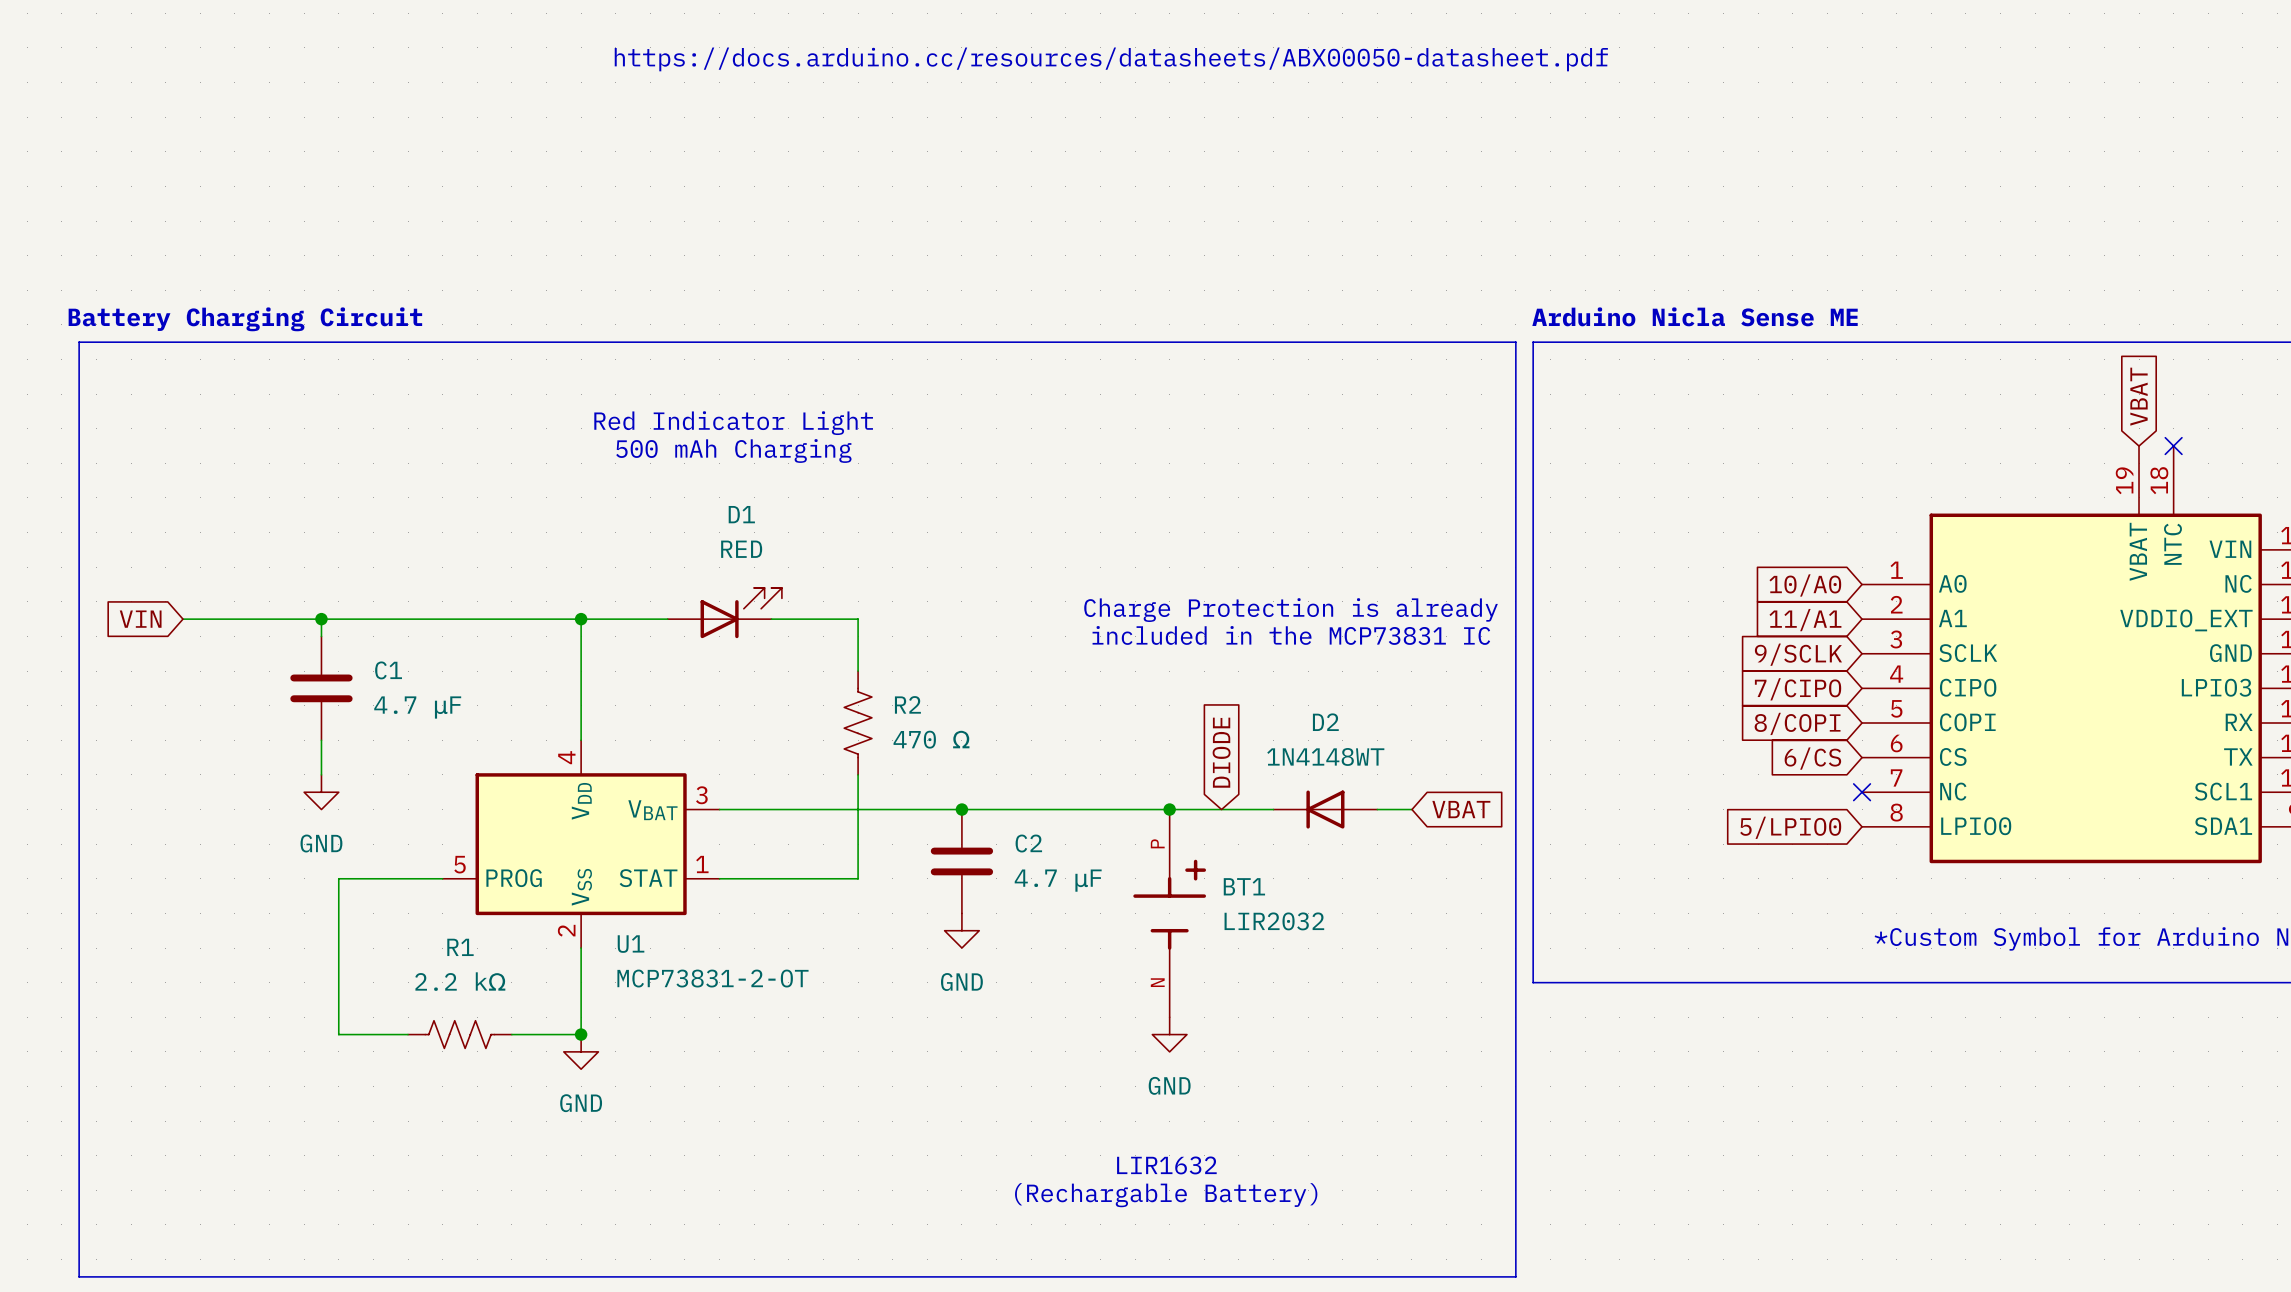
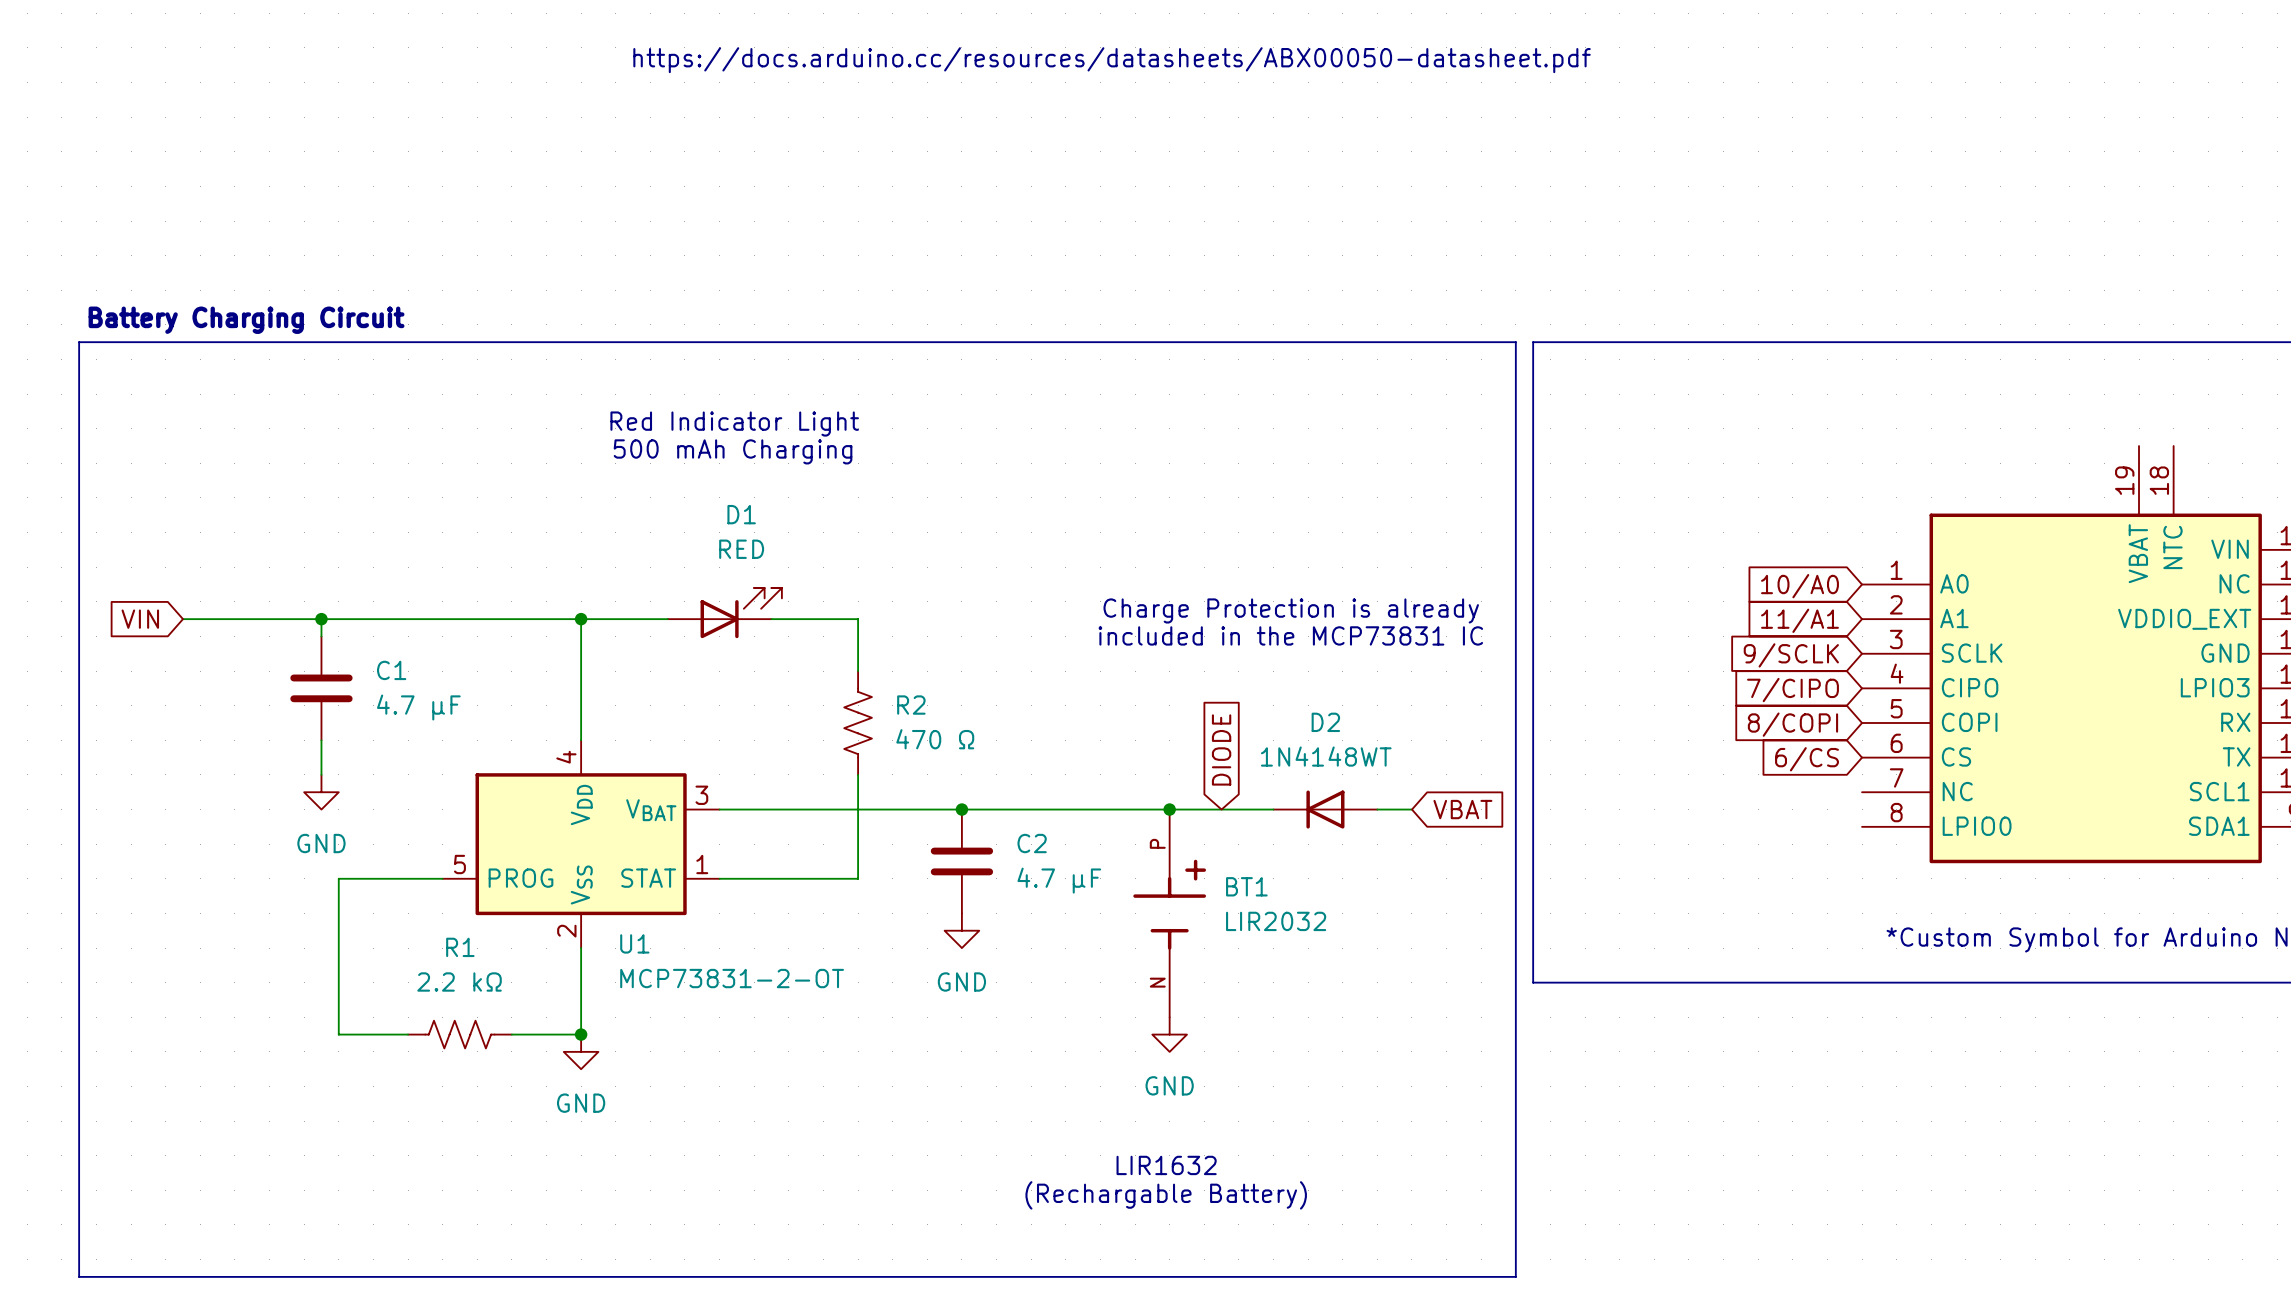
text: Arduino Nicla Sense ME (1695, 316) -> none
global label: VBAT (2139, 396) -> none
no-connect mark: (2173, 446) -> none
no-connect mark: (1862, 792) -> none
global label: 5/LPIO0 (1790, 827) -> none

